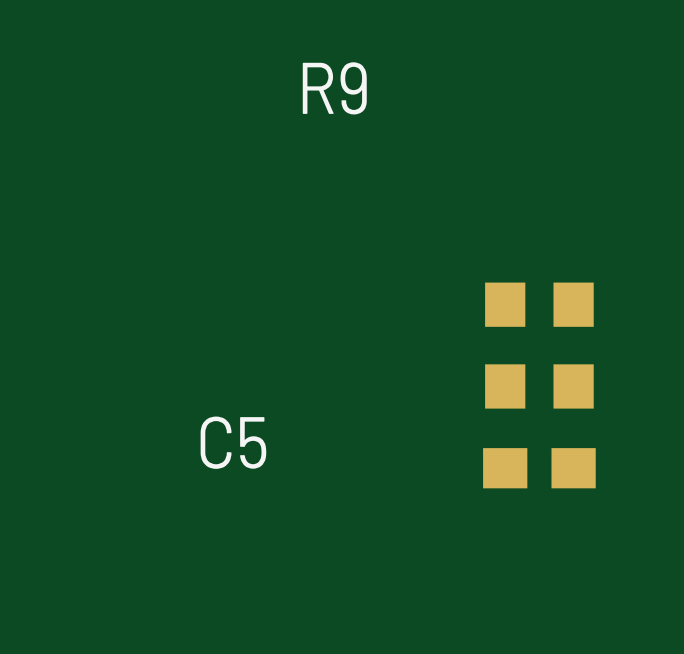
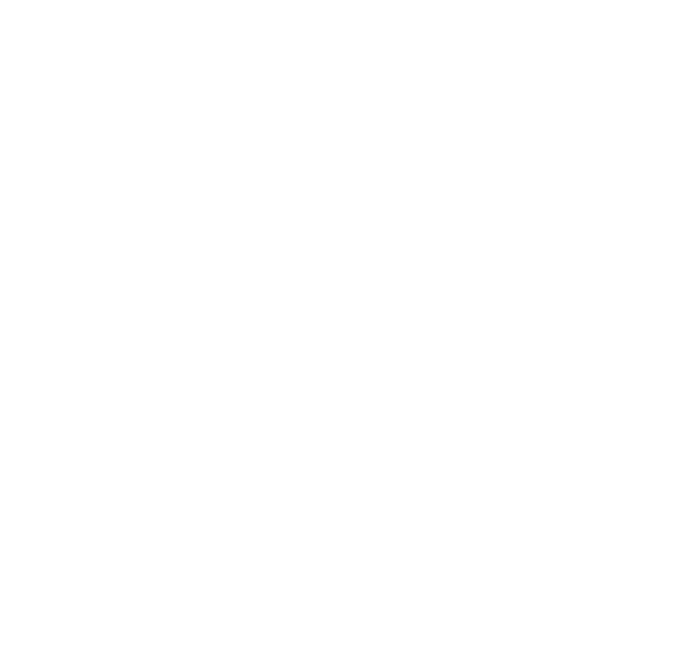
R9: (539, 304) -> none
part: (539, 386) -> none
C5: (539, 468) -> none

